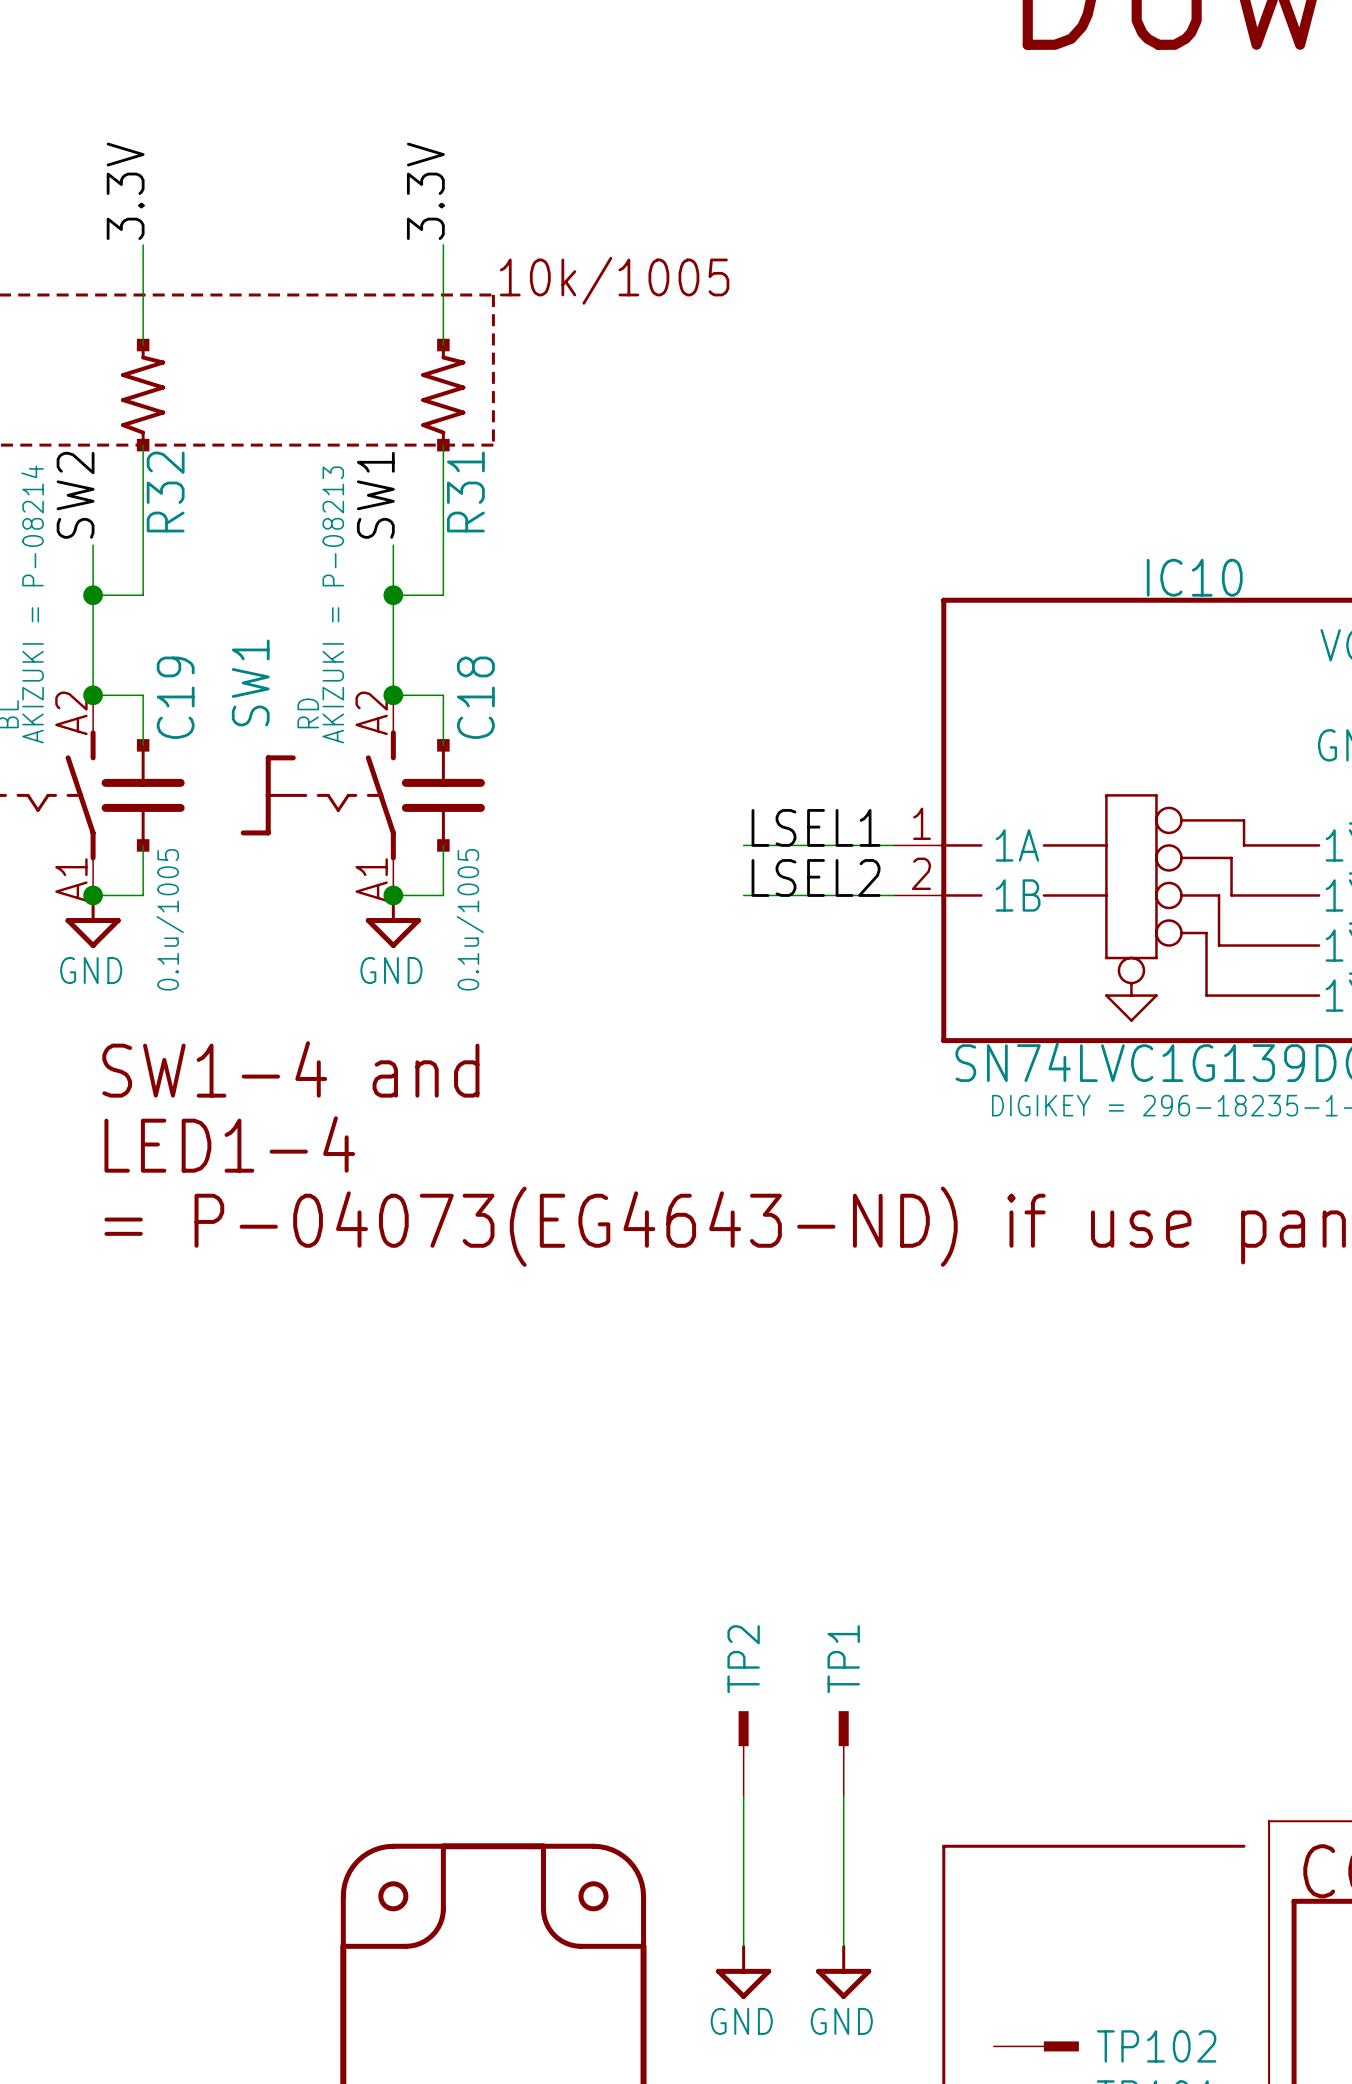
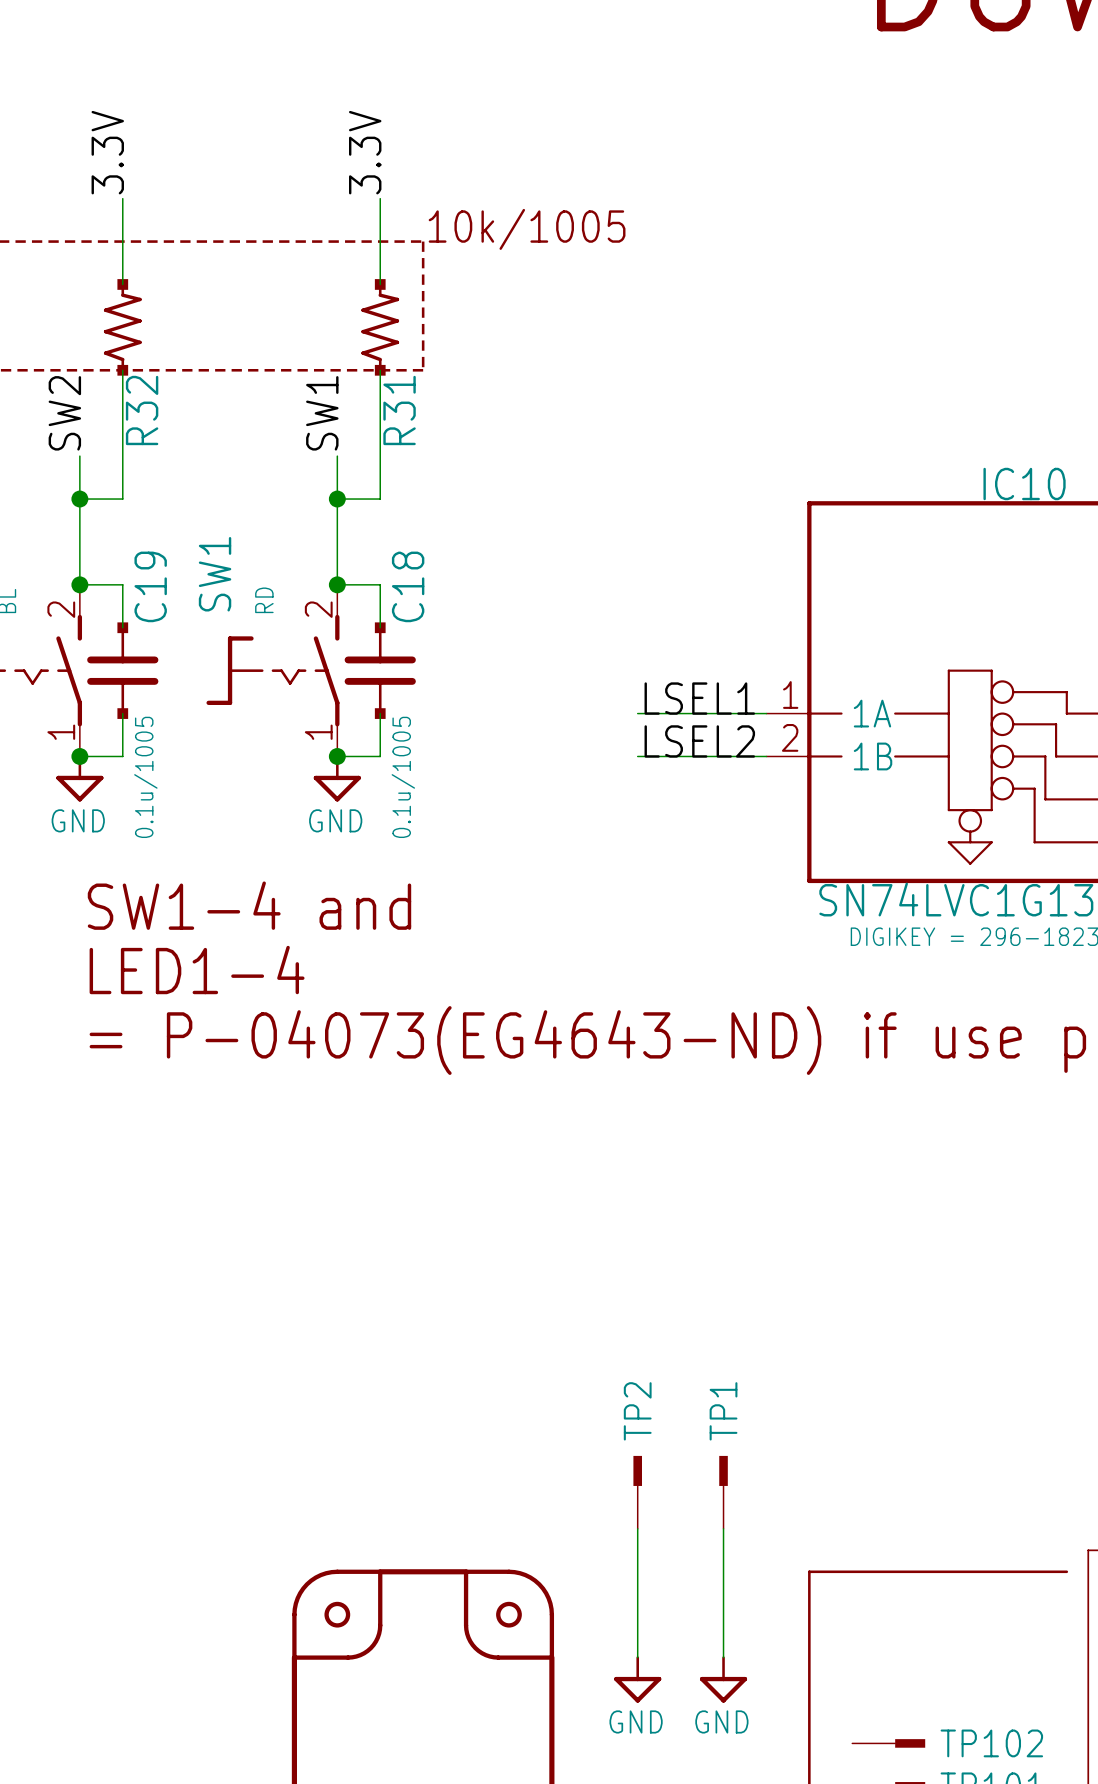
part text: AKIZUKI = P-08214 (32, 604) -> none
SW1 text: AKIZUKI = P-08213 (333, 604) -> none
part pin number: A2 (71, 713) -> 2 (61, 609)
SW1 pin number: A2 (371, 713) -> 2 (318, 609)
part pin number: A1 (71, 880) -> 1 (61, 732)
SW1 pin number: A1 (371, 880) -> 1 (318, 732)

